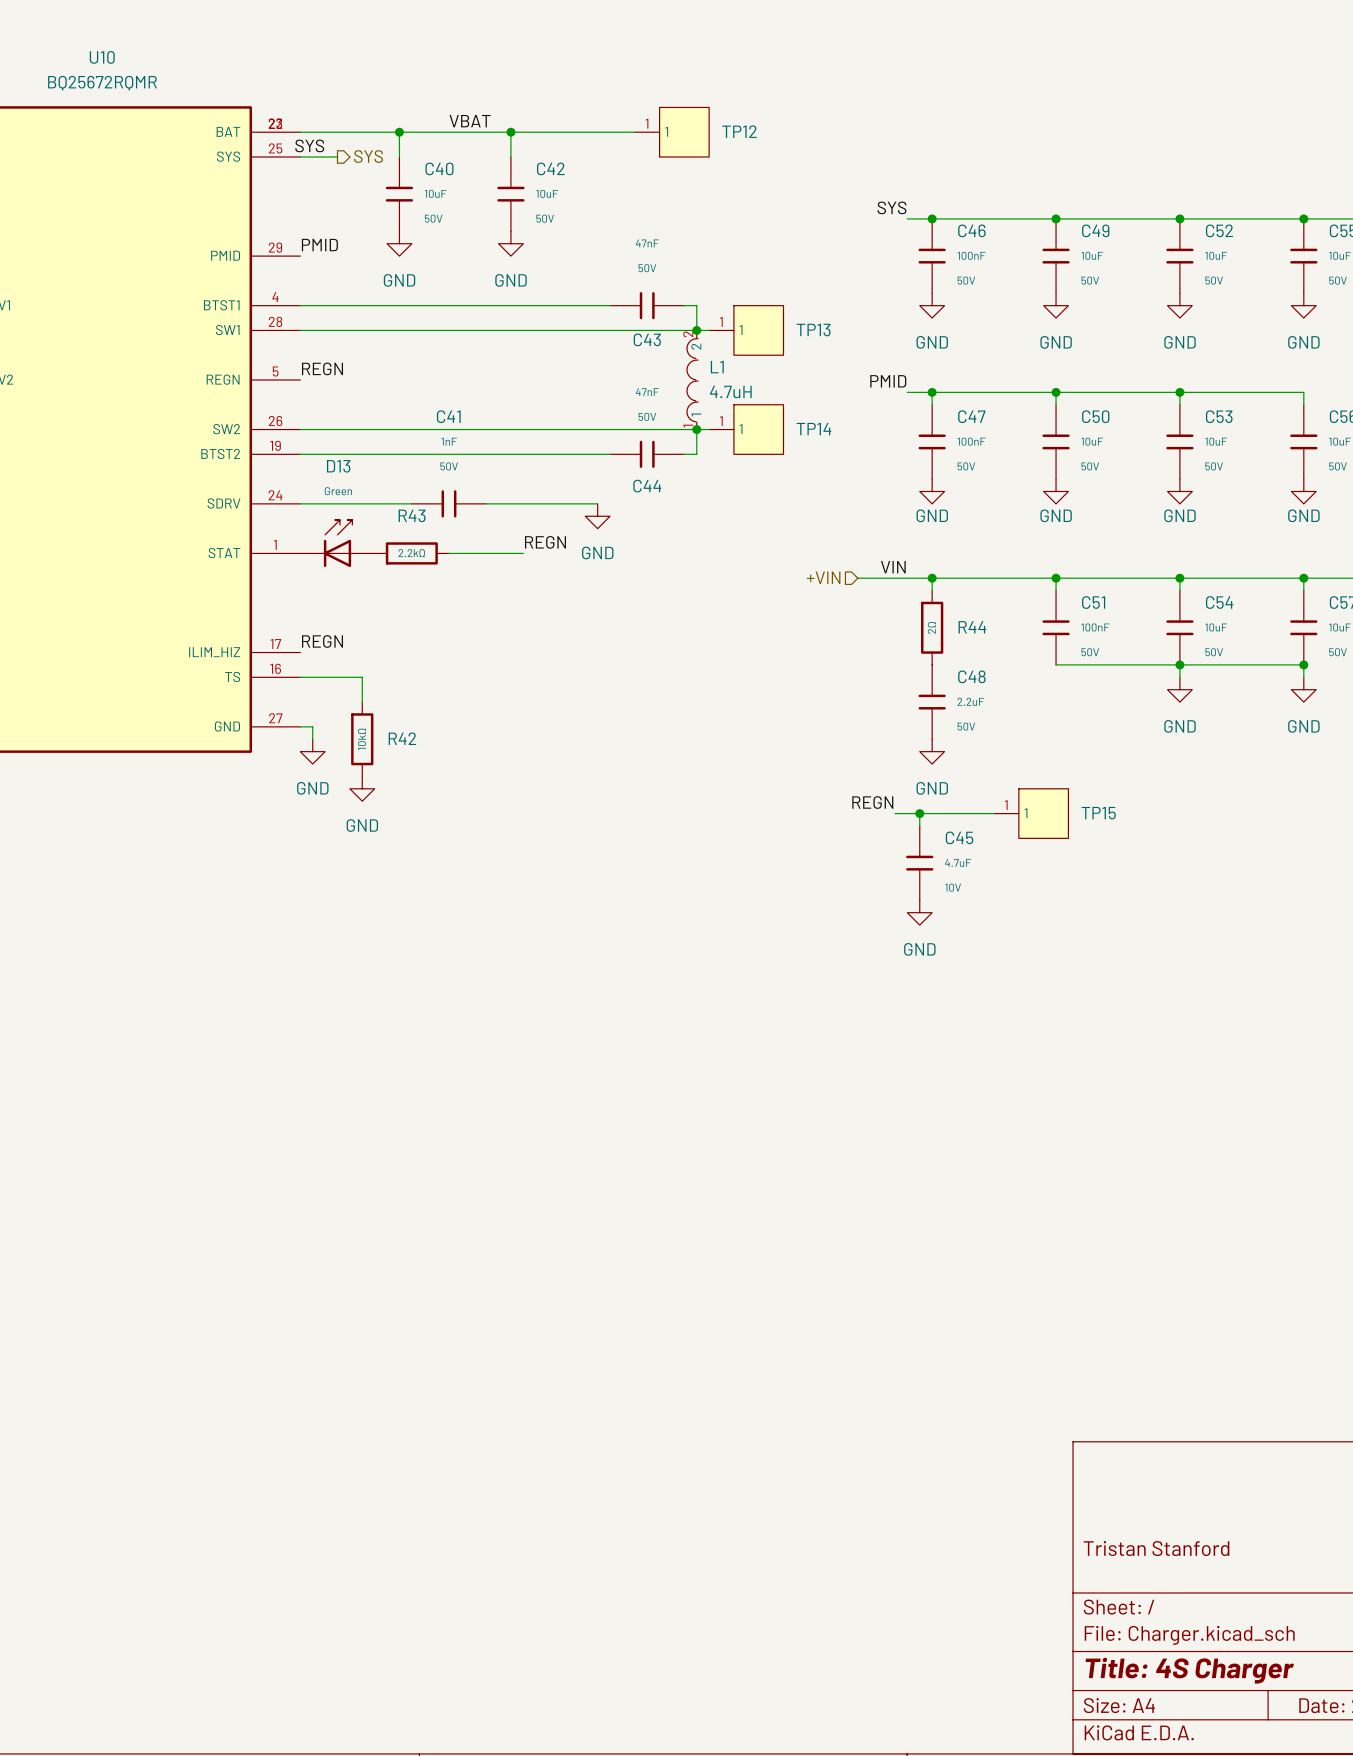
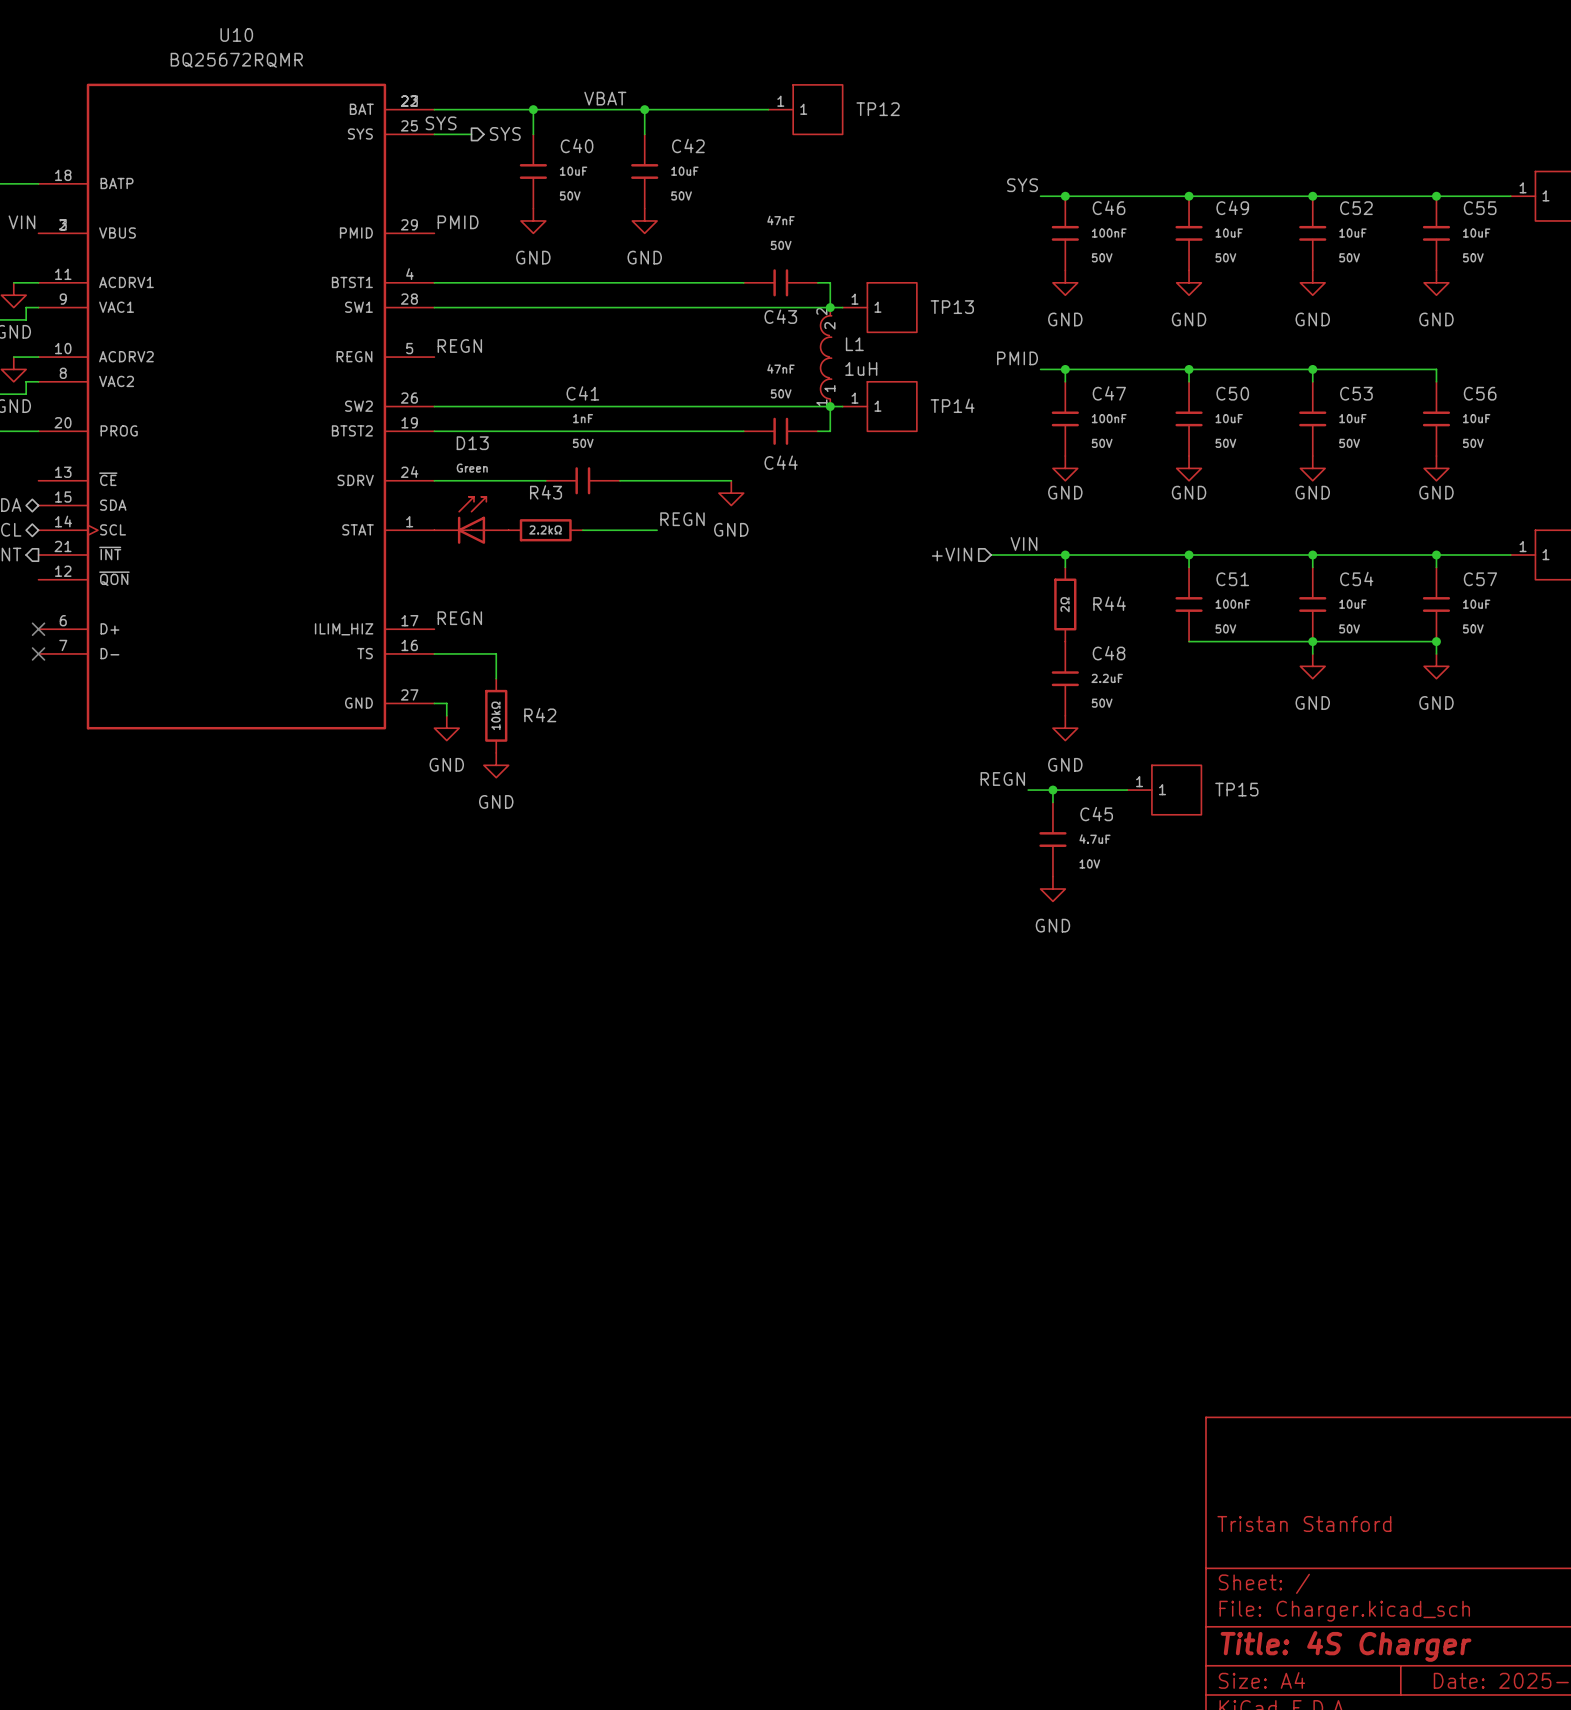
L1 value: 4.7uH (730, 391) -> 1uH (861, 368)

